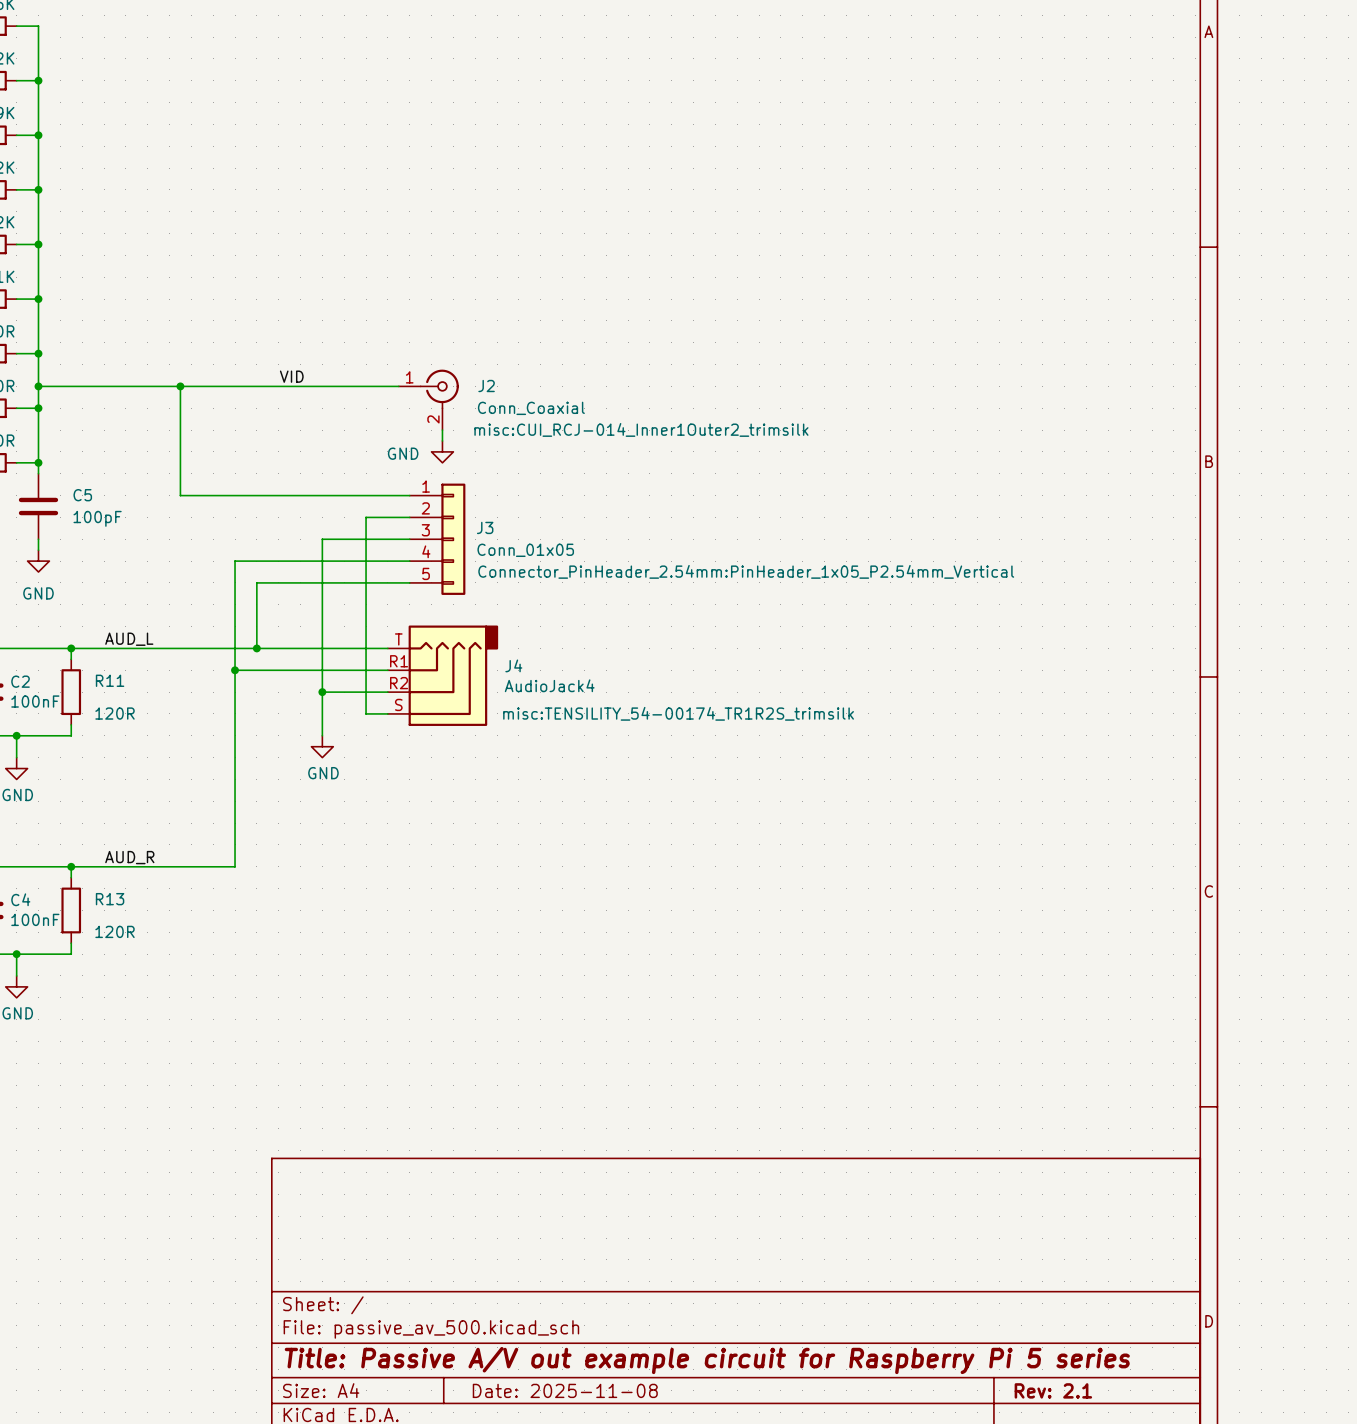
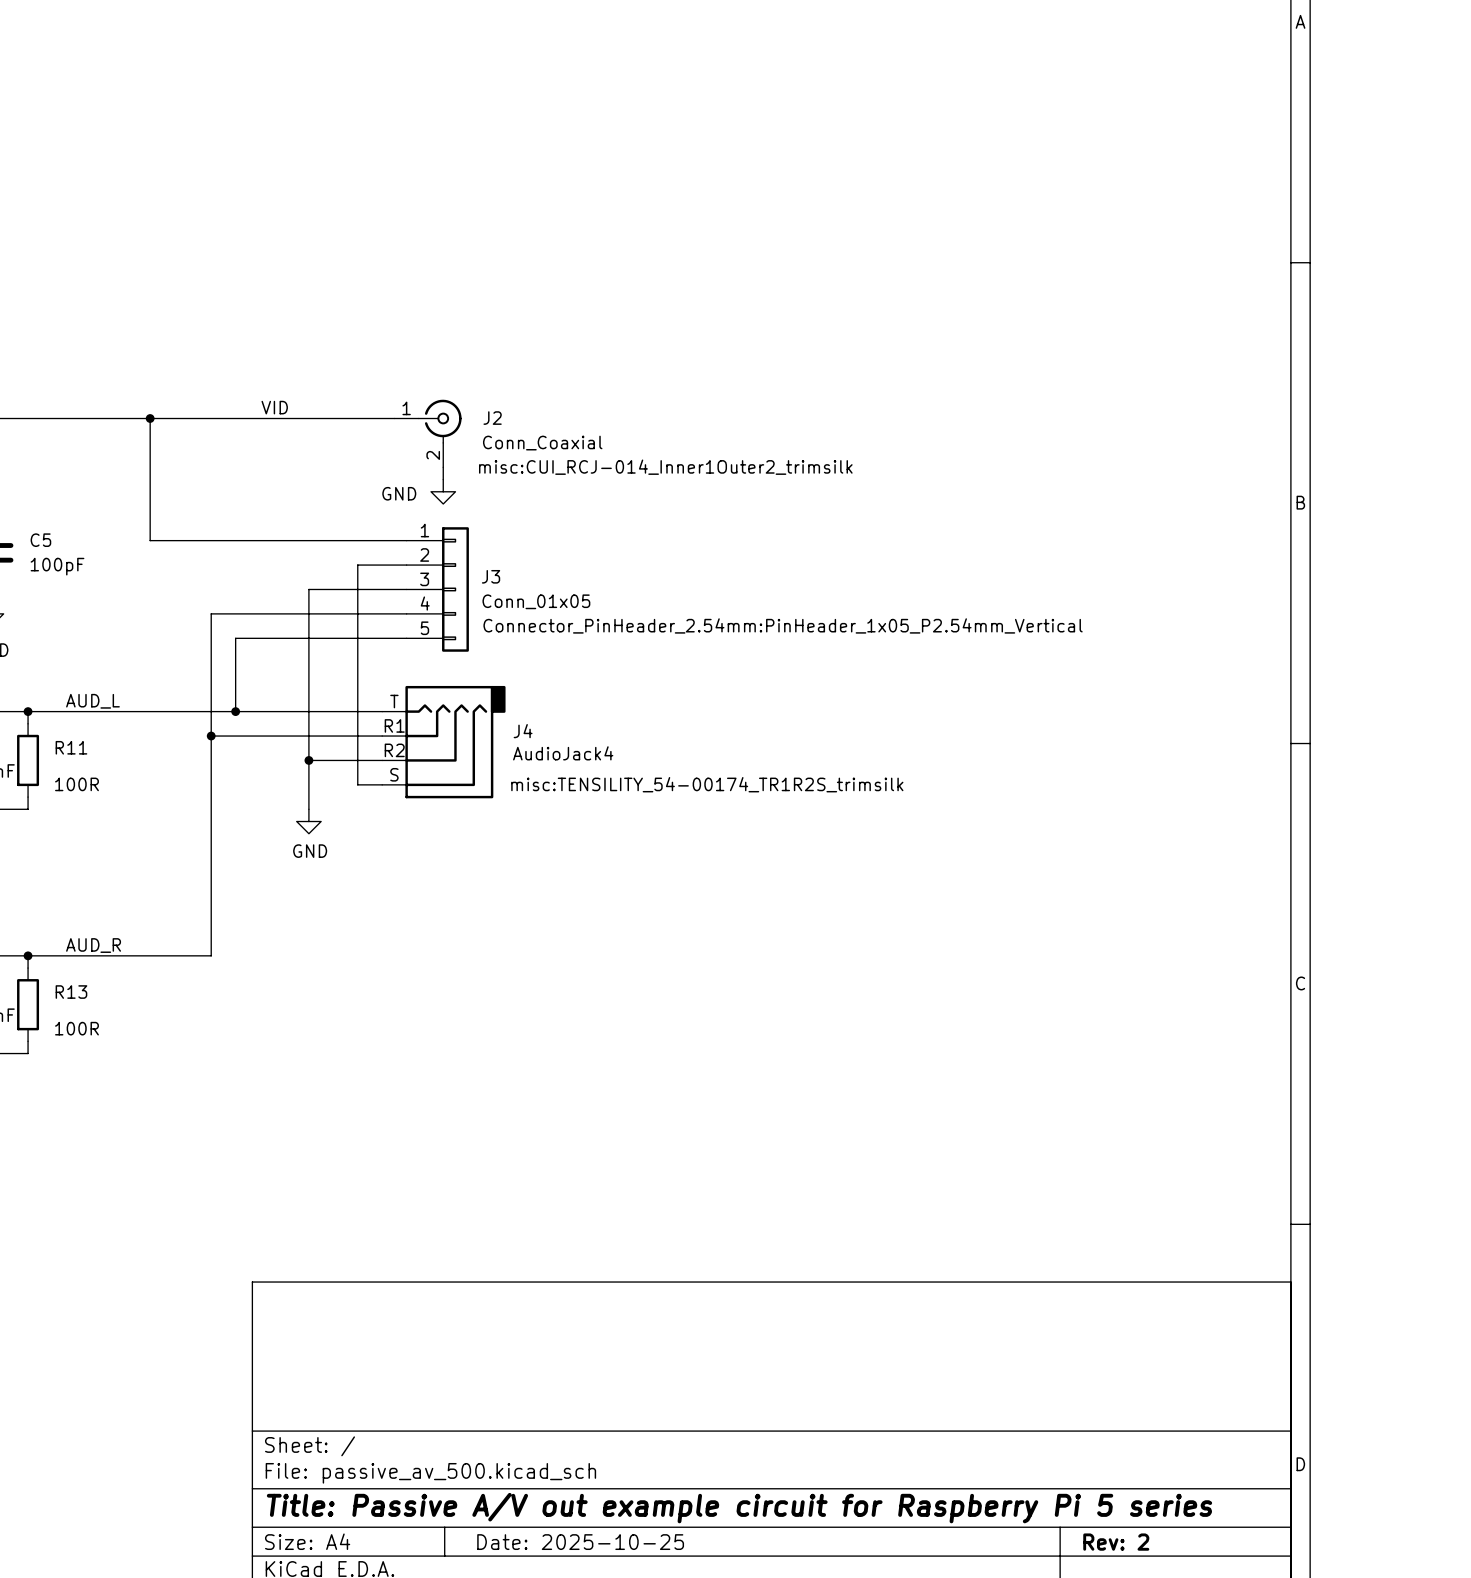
R11 value: 120R (115, 713) -> 100R (76, 784)
R13 value: 120R (115, 931) -> 100R (76, 1028)
title block: Date: 2025-11-08 (565, 1390) -> Date: 2025-10-25 (580, 1542)
title block: Rev: 2.1 (1053, 1390) -> Rev: 2 (1116, 1542)

